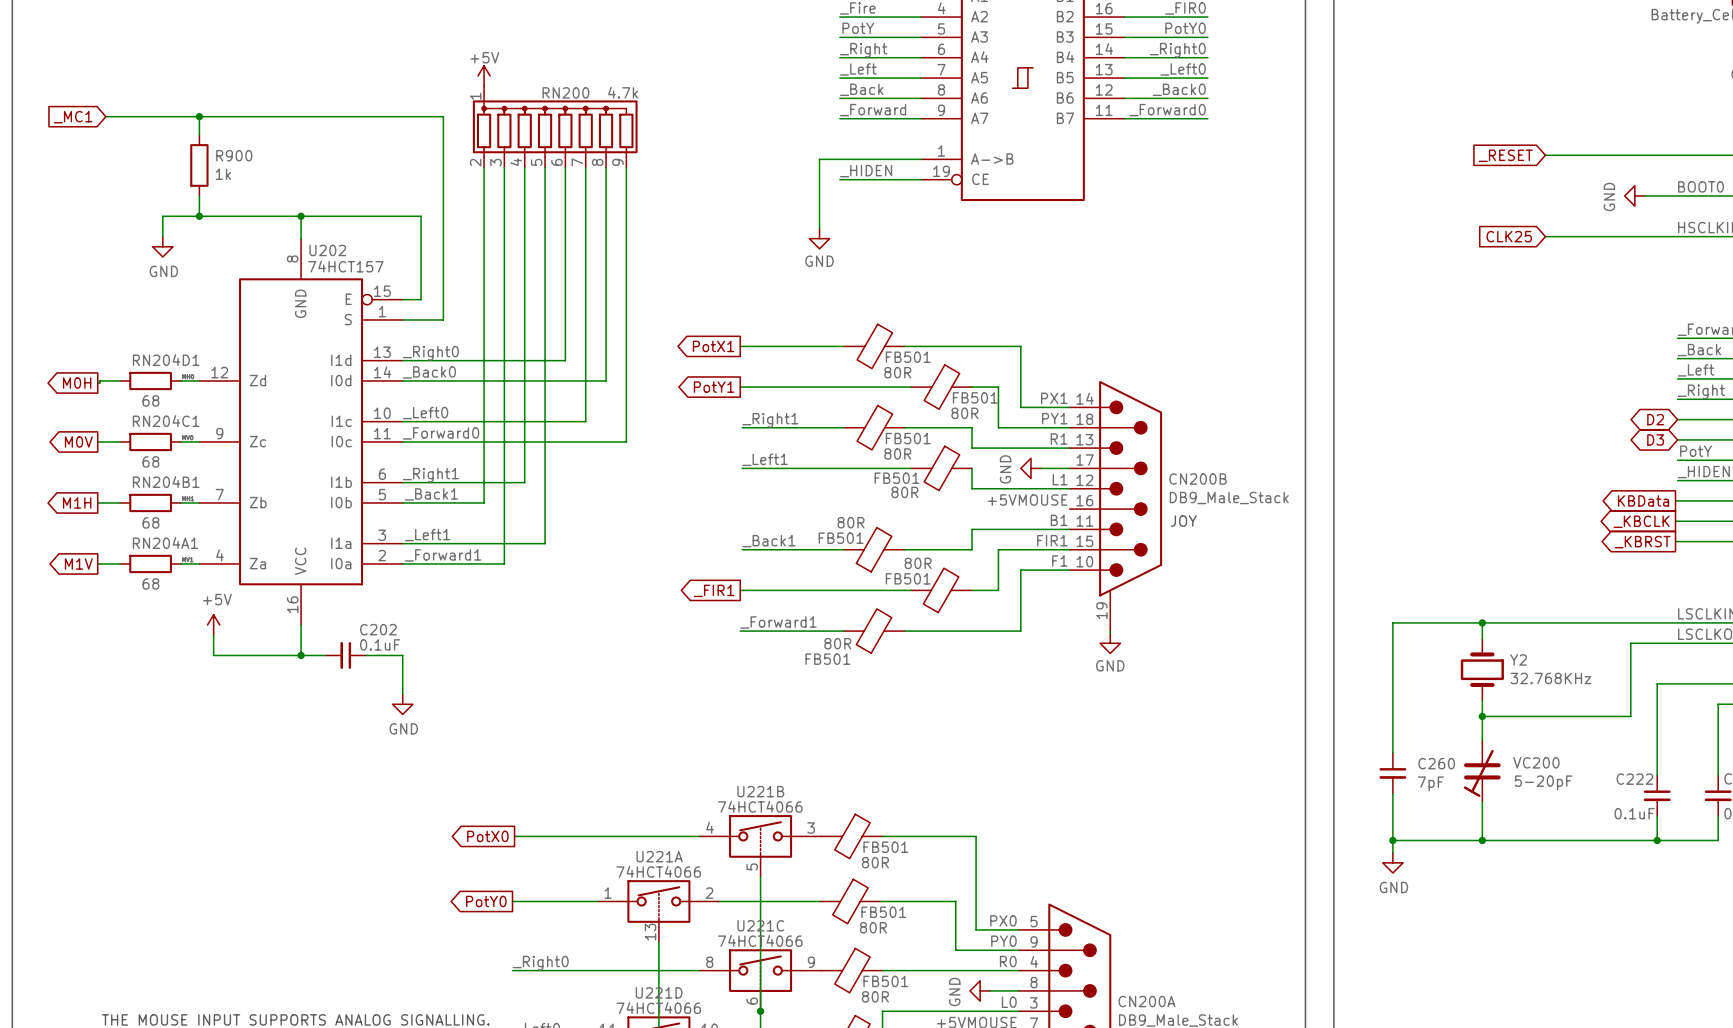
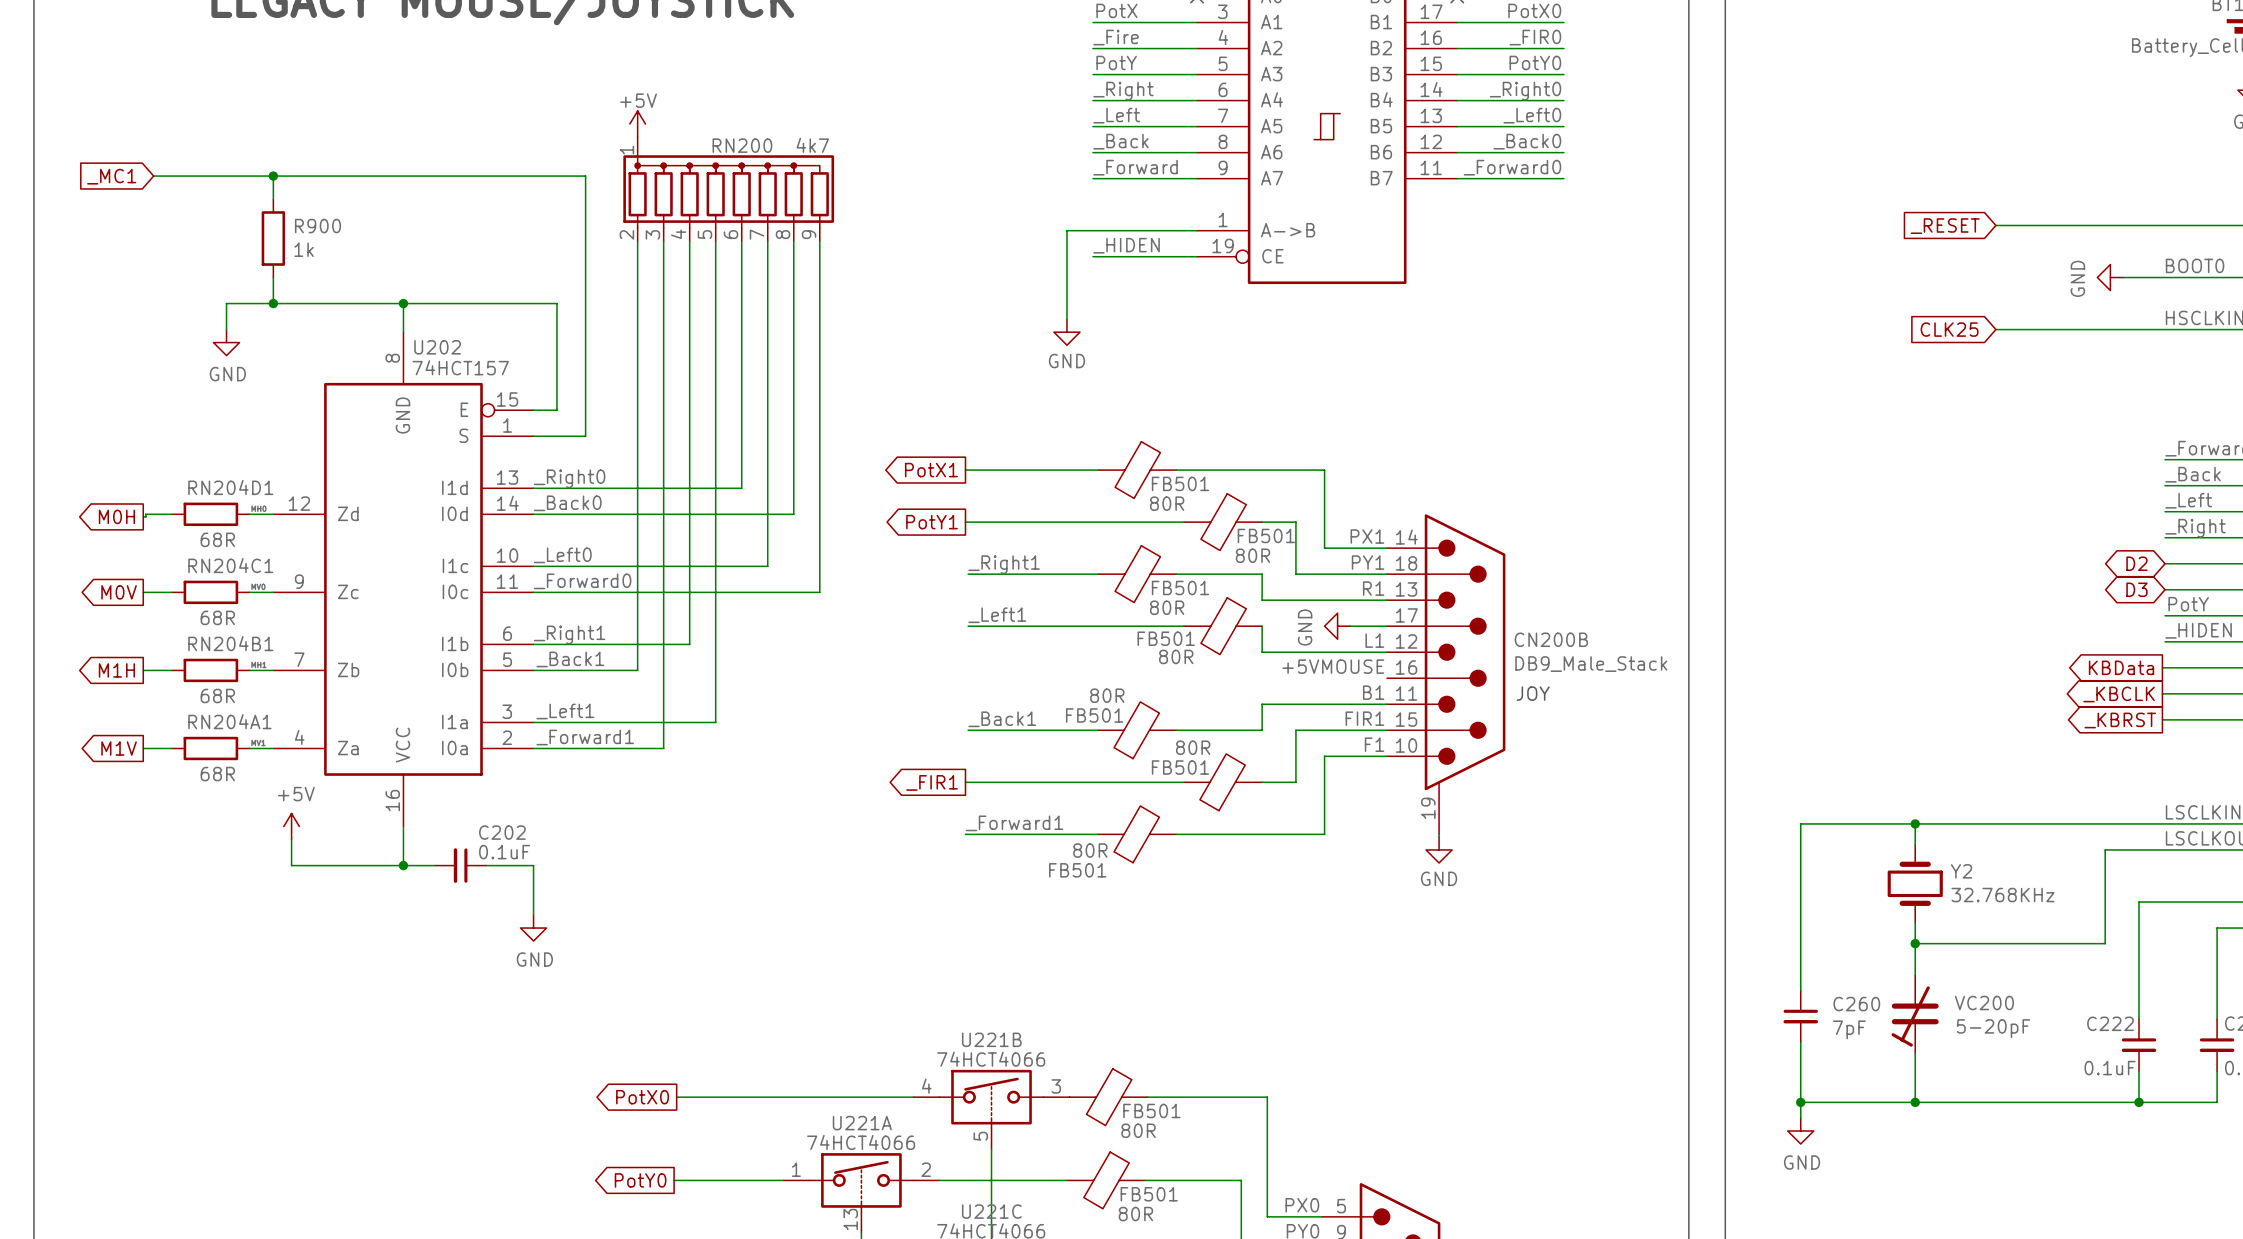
RN200 value: 4.7k (623, 92) -> 4k7 (812, 145)
RN204D1 value: 68 (150, 400) -> 68R (217, 539)
RN204C1 value: 68 (150, 461) -> 68R (217, 617)
RN204B1 value: 68 (150, 522) -> 68R (217, 695)
RN204A1 value: 68 (150, 583) -> 68R (217, 774)

